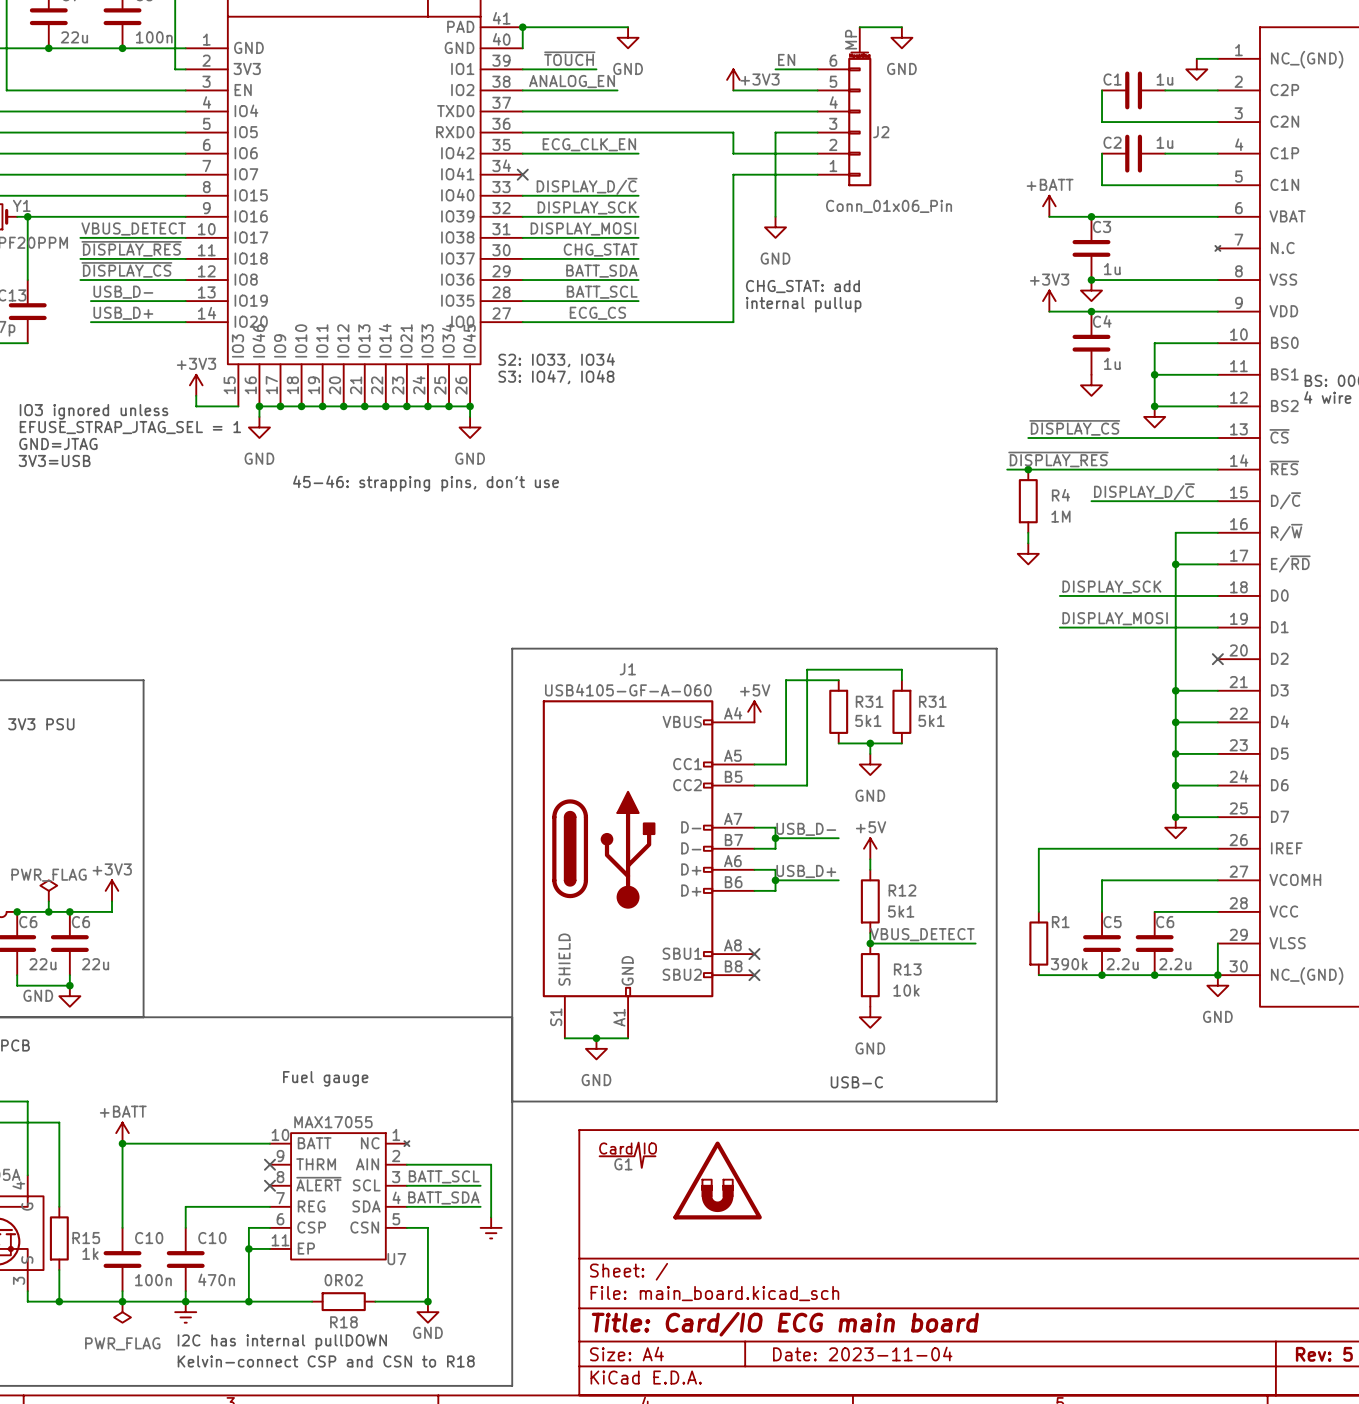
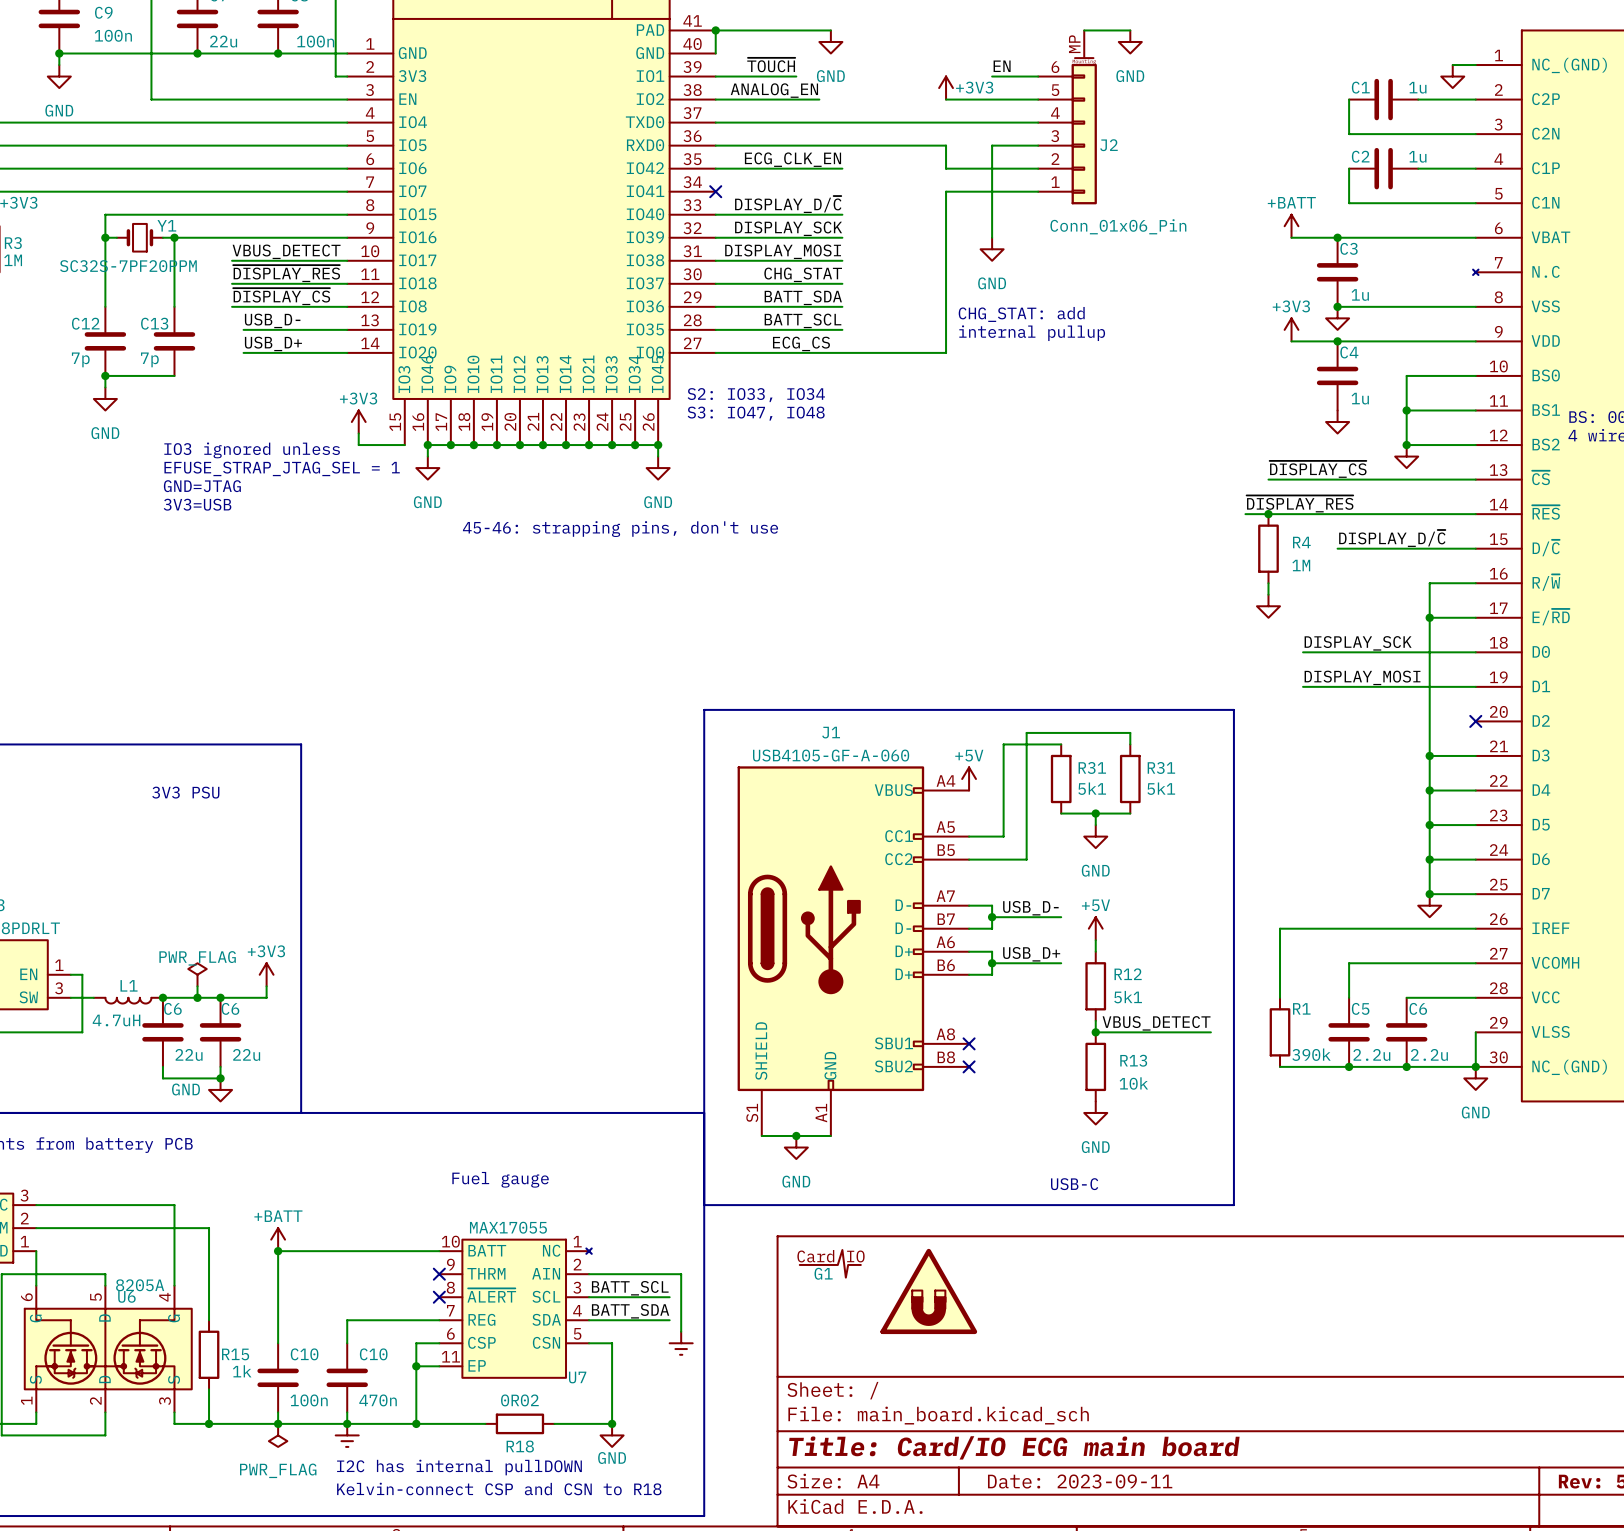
title block: Date: 2023-11-04 (862, 1354) -> Date: 2023-09-11 (1080, 1481)

